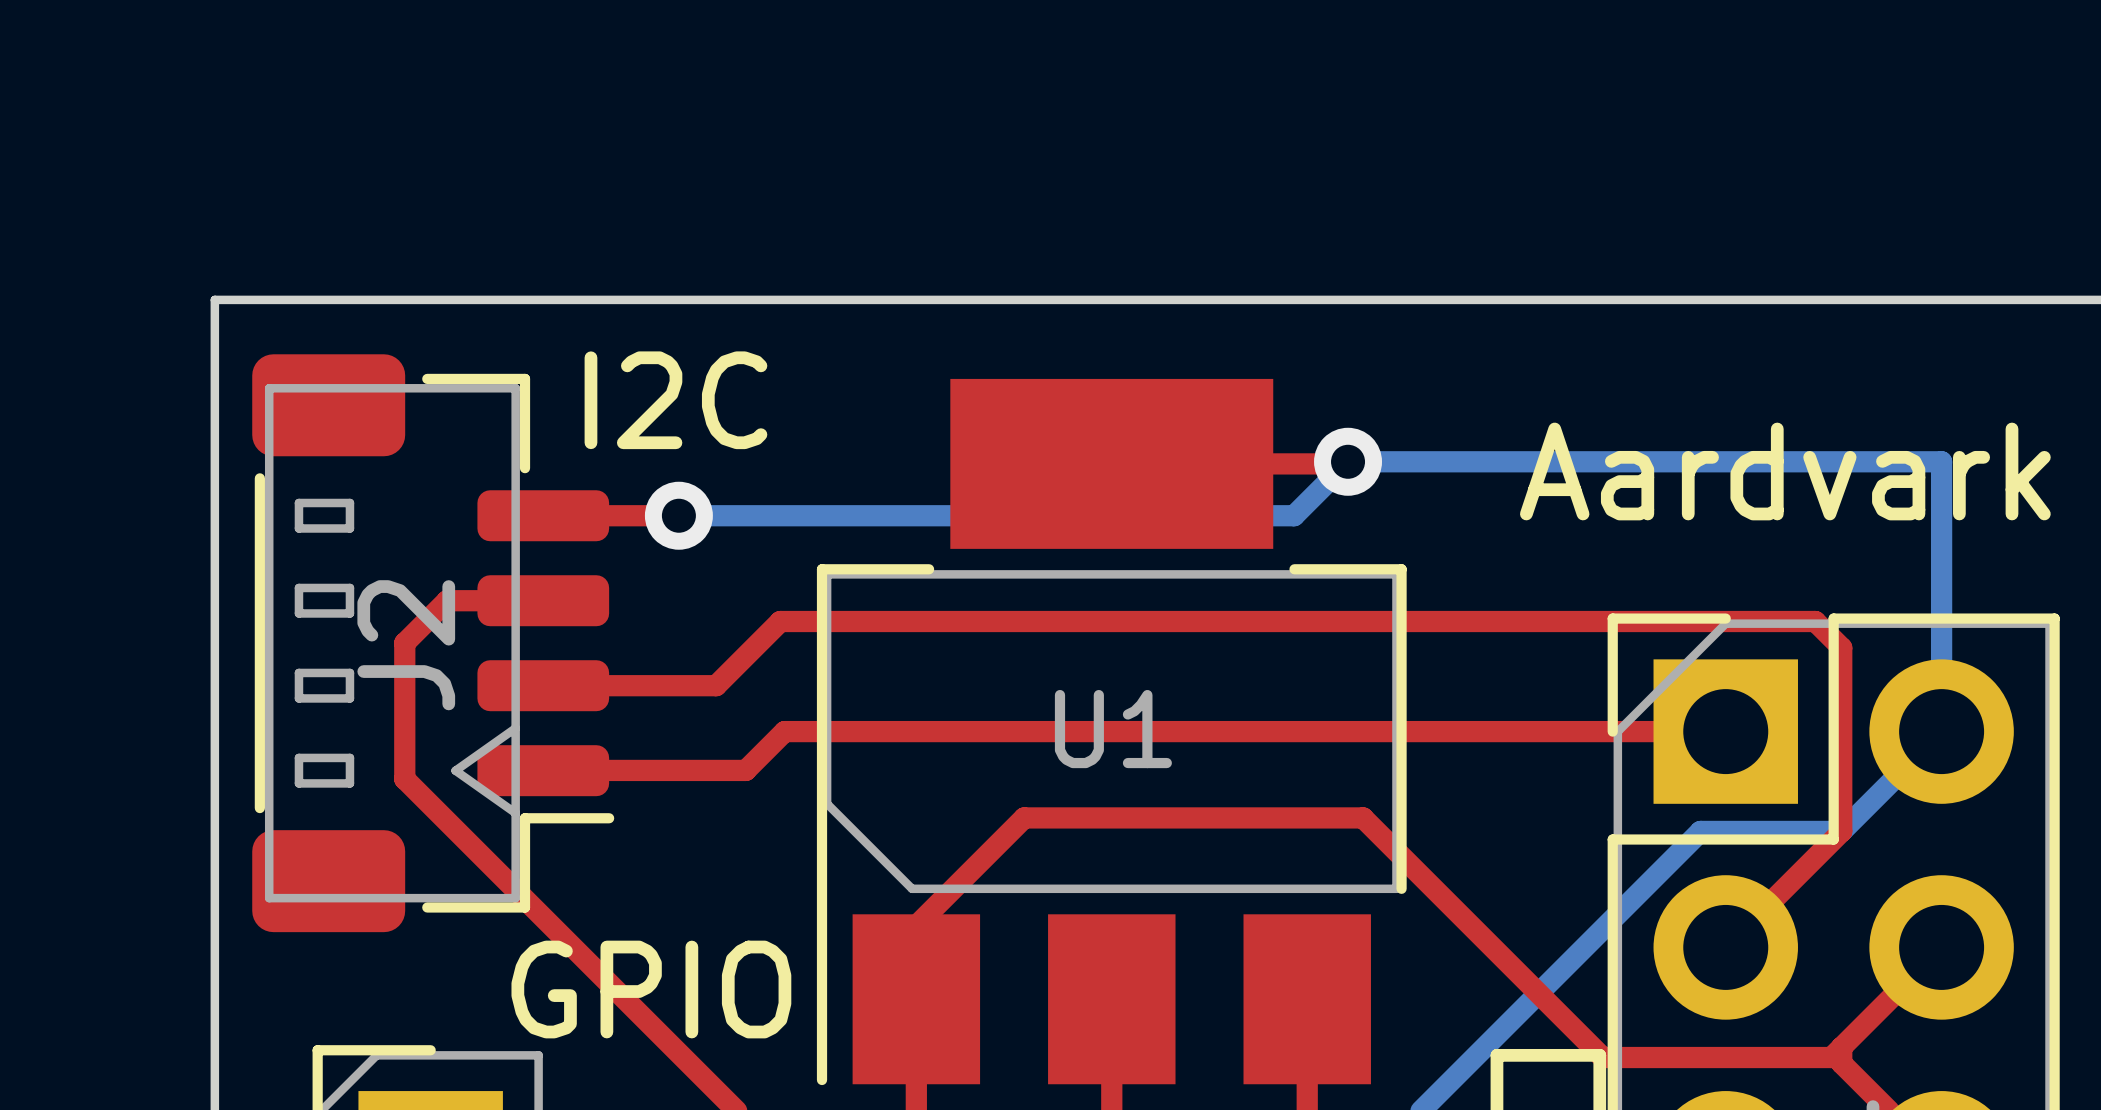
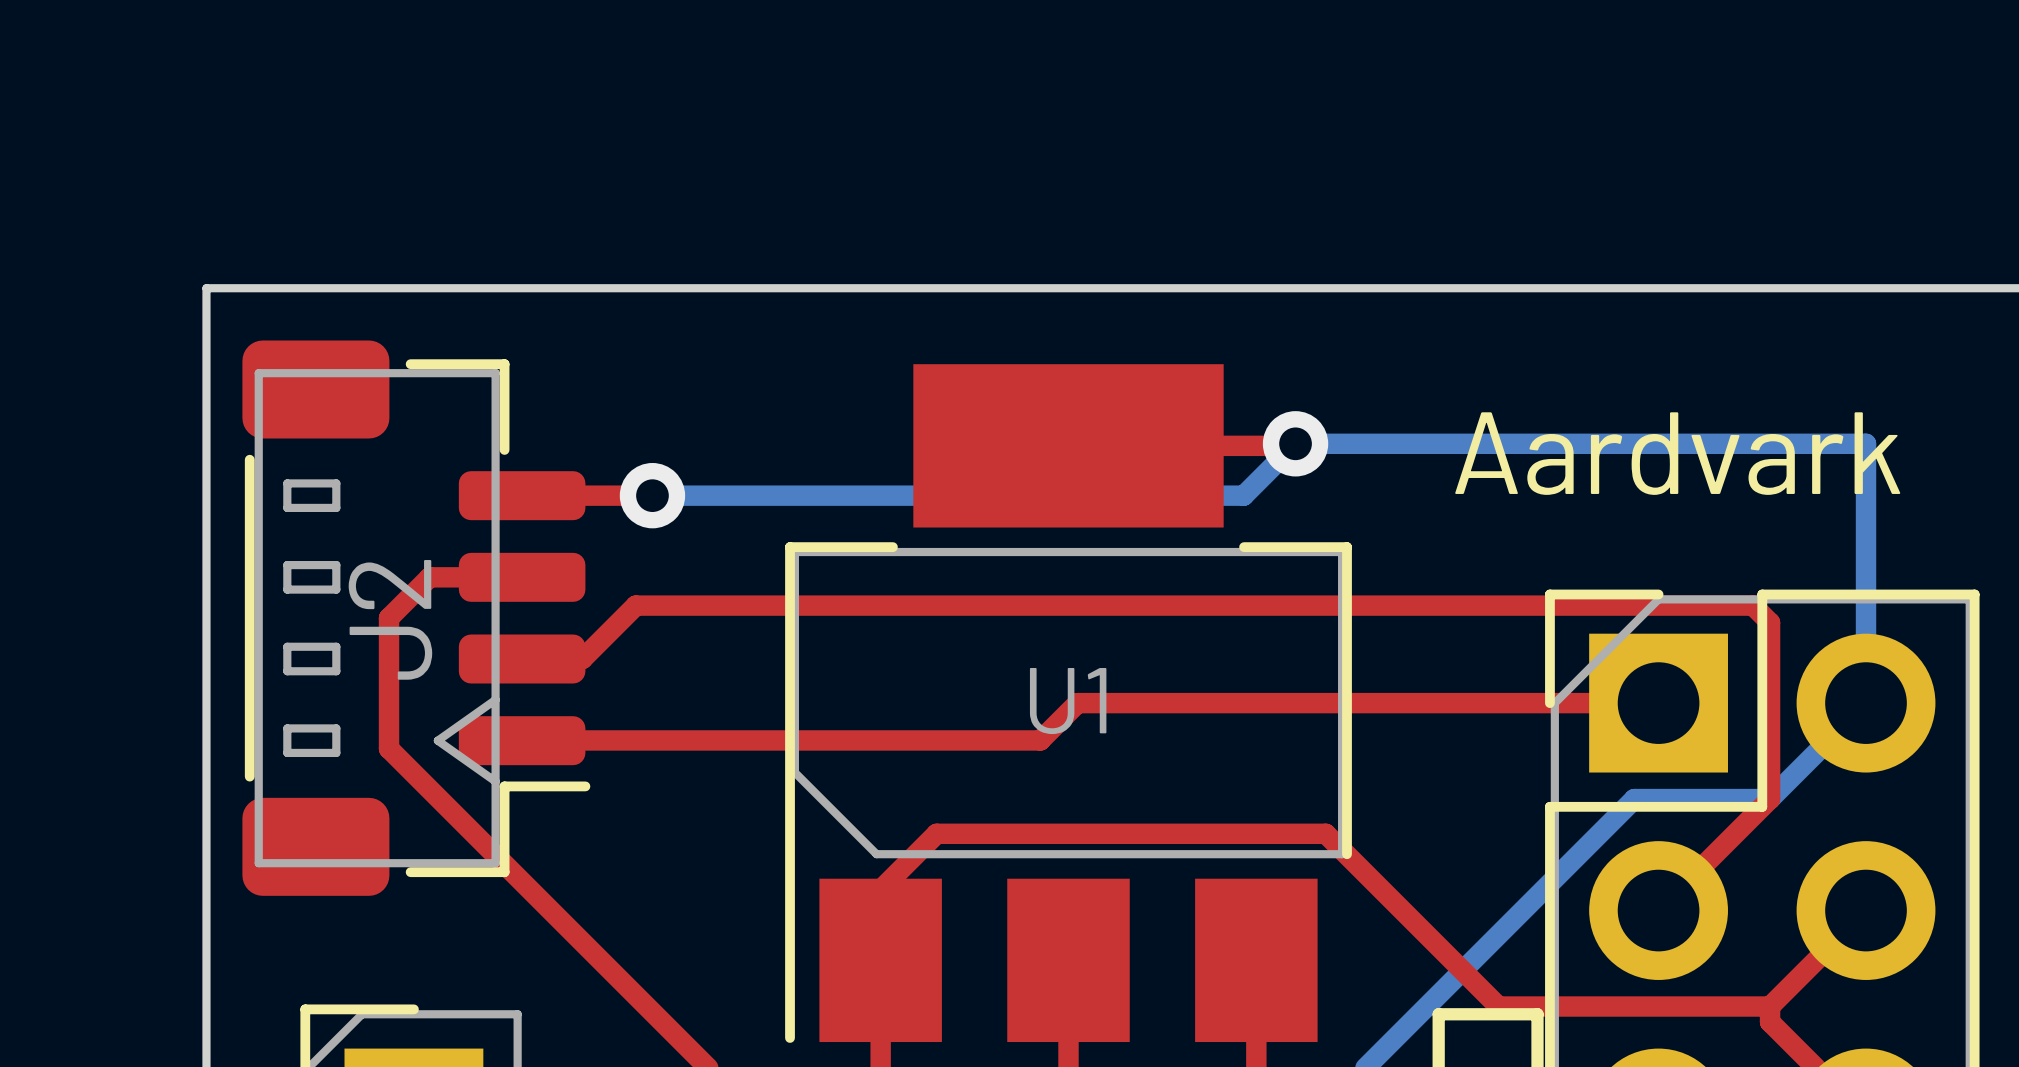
text: I2C (675, 400) -> none
top track: (1824, 630) (1815, 621) (780, 621) (716, 685) (606, 685) -> (1753, 605) (635, 605) (582, 659)
top track: (1121, 731) (784, 731) (745, 770) -> (1077, 703) (1040, 740) (716, 740)
top track: (974, 867) (1024, 817) (1363, 817) (1602, 1057) (1831, 1057) (1841, 1047) -> (936, 833) (1325, 833) (1498, 1006) (1770, 1006)
text: GPIO (651, 989) -> none

